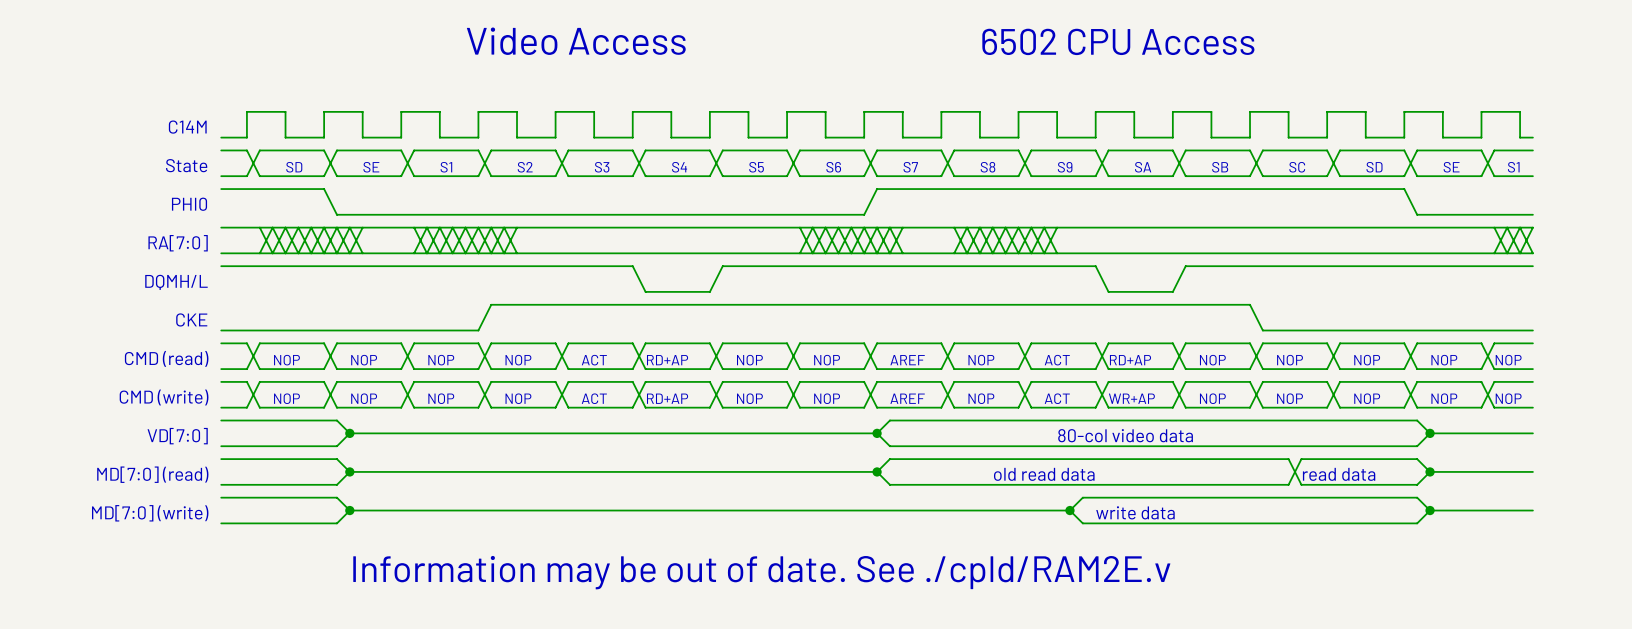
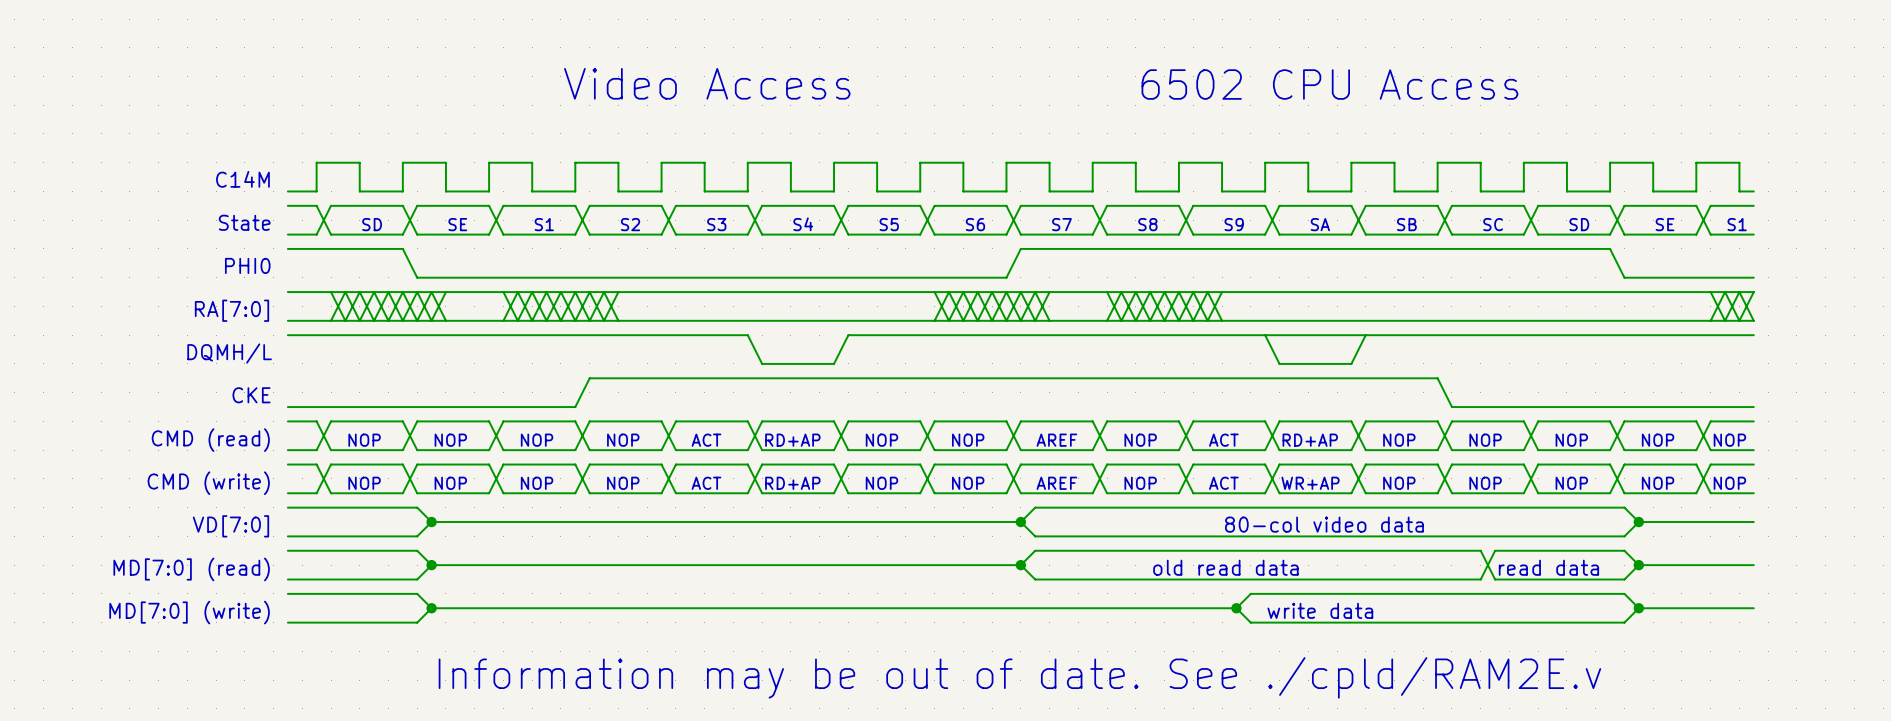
wire: none -> (1265, 335) (1365, 335)

